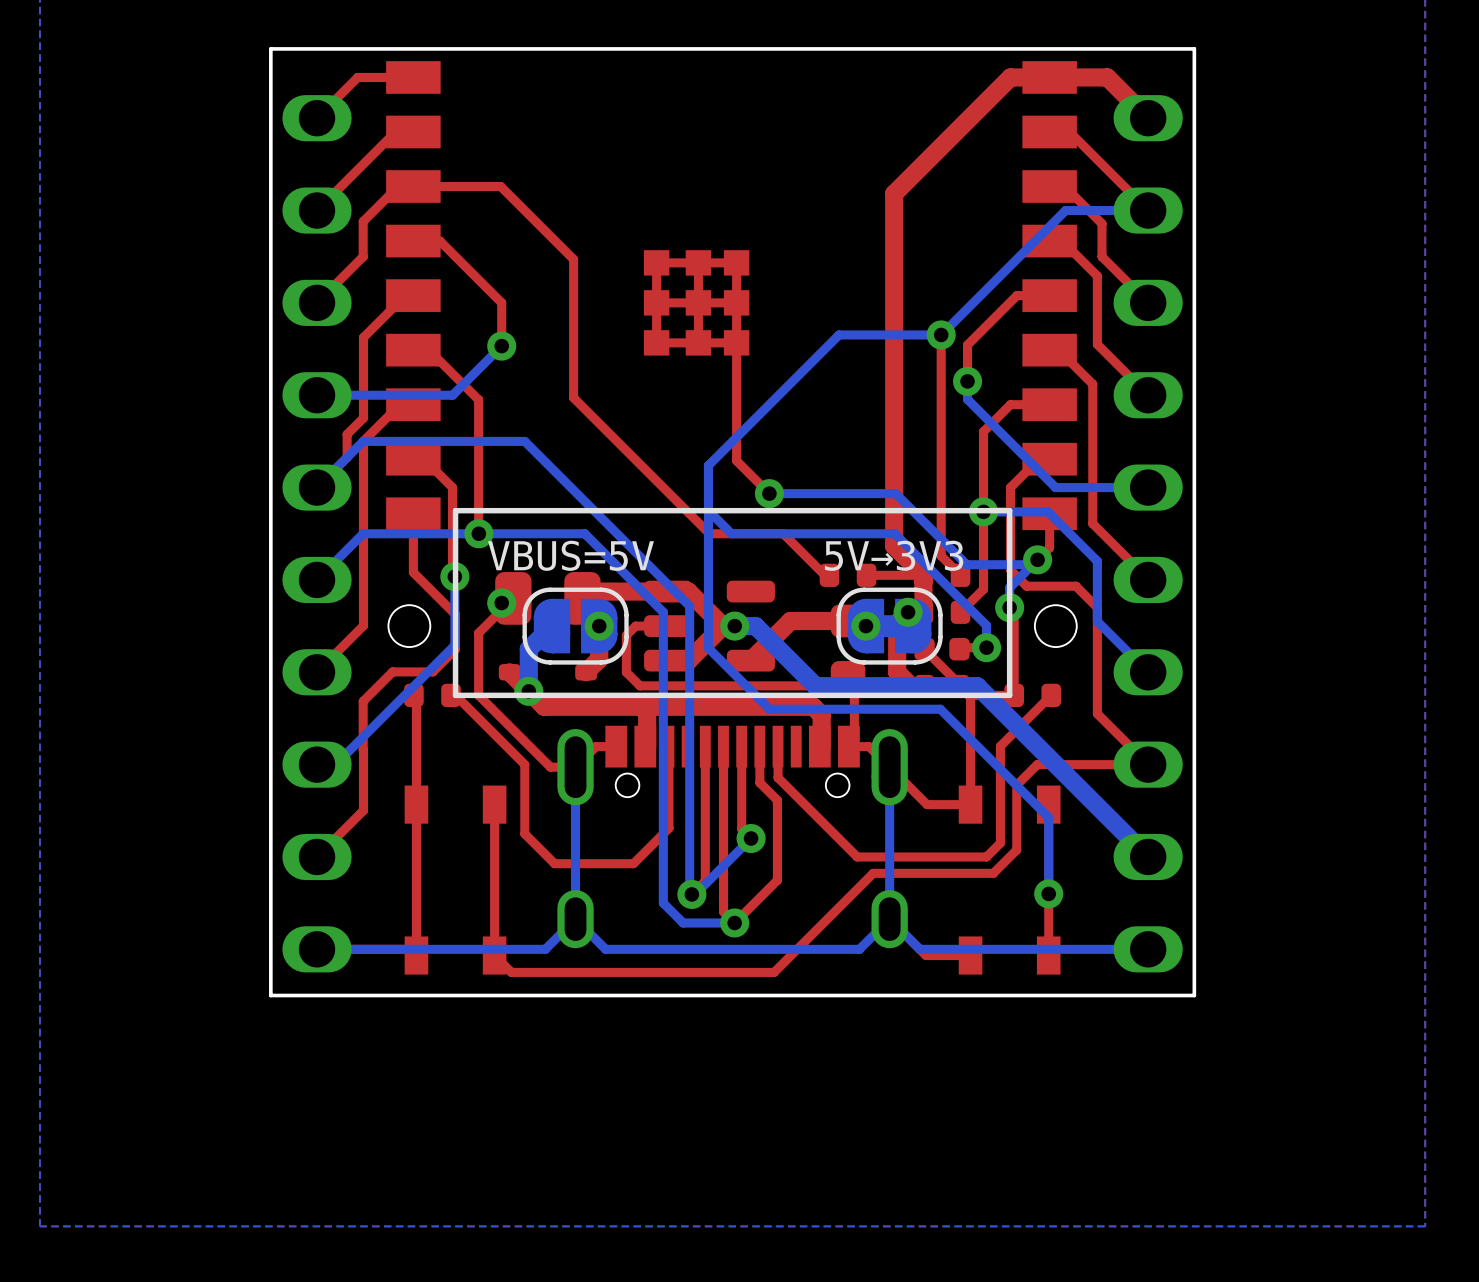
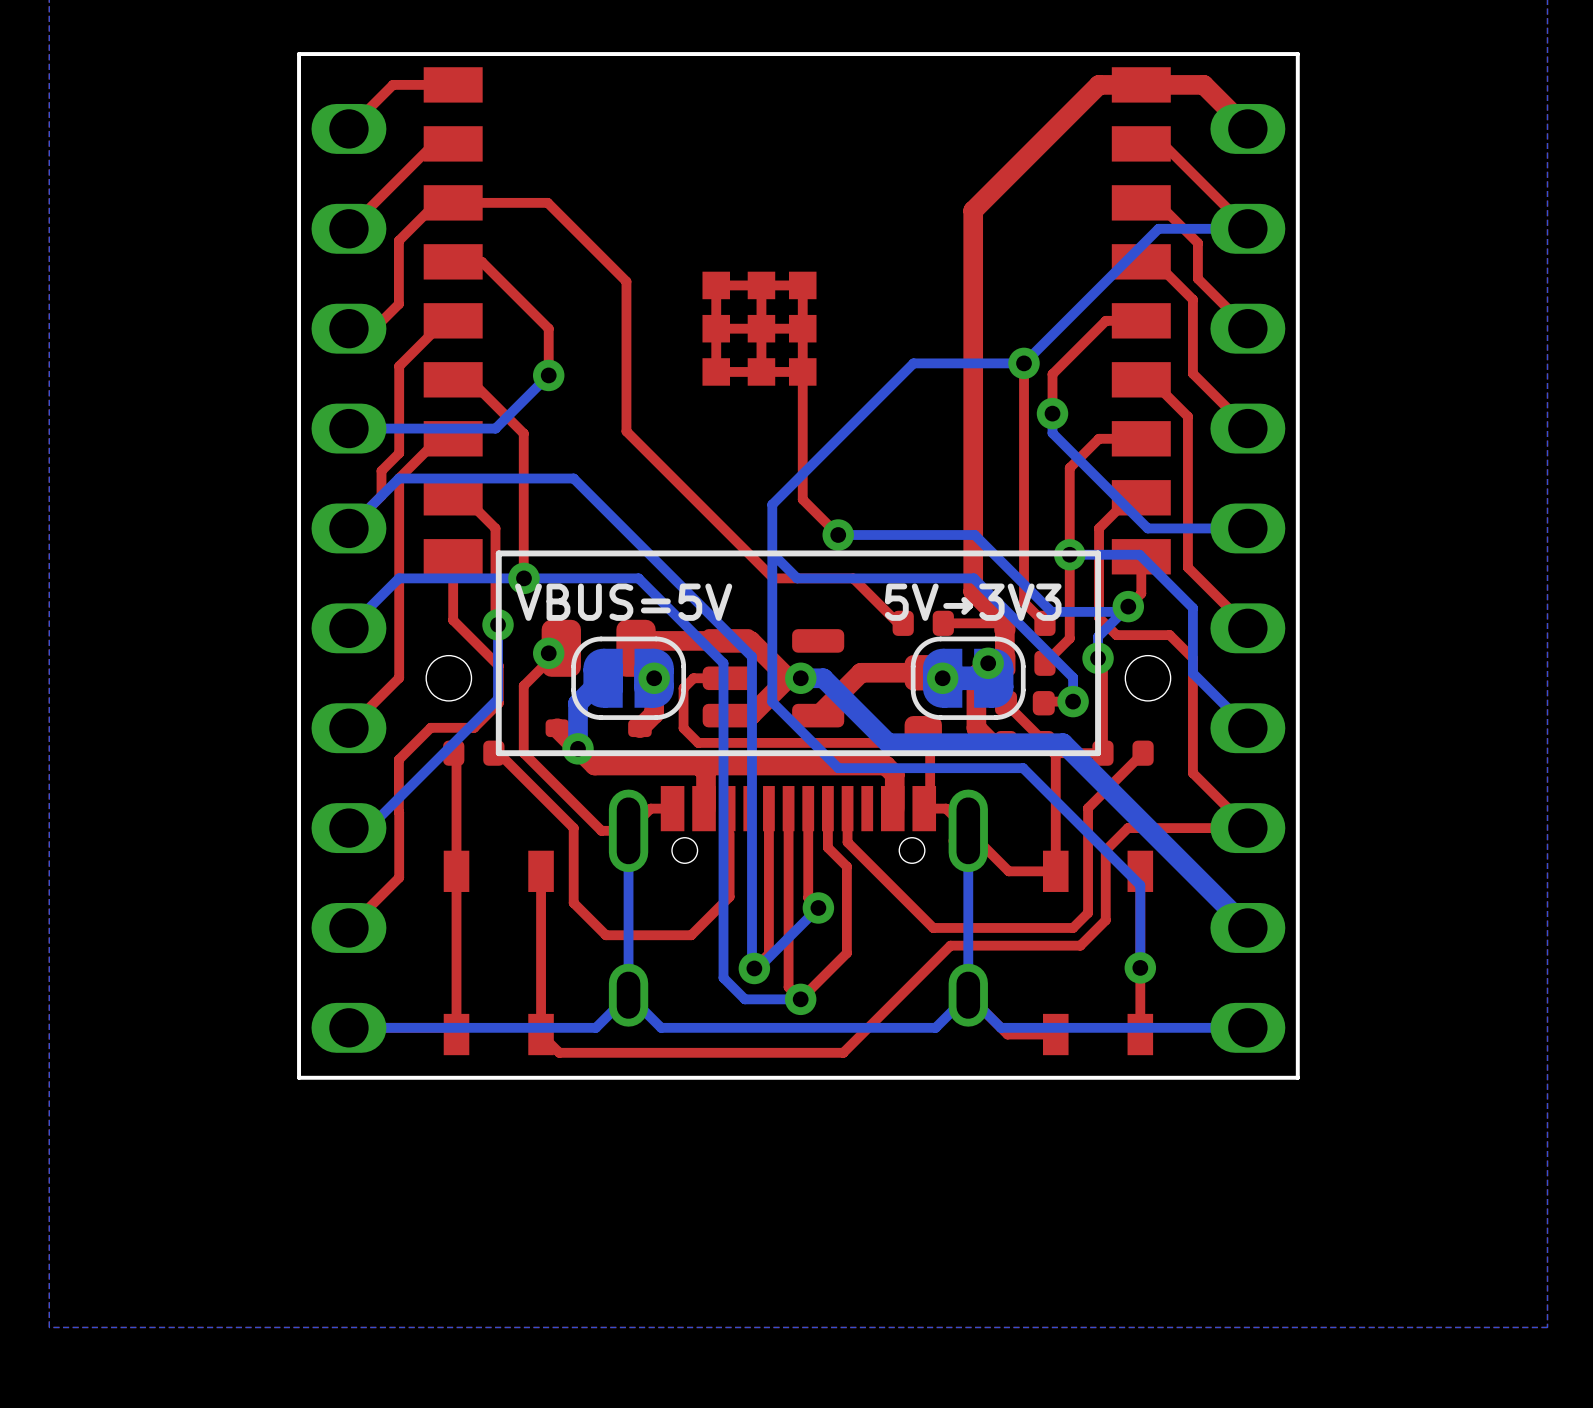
top track: (363, 256) (317, 302) -> (398, 278) (398, 304) (374, 328) (348, 328)

